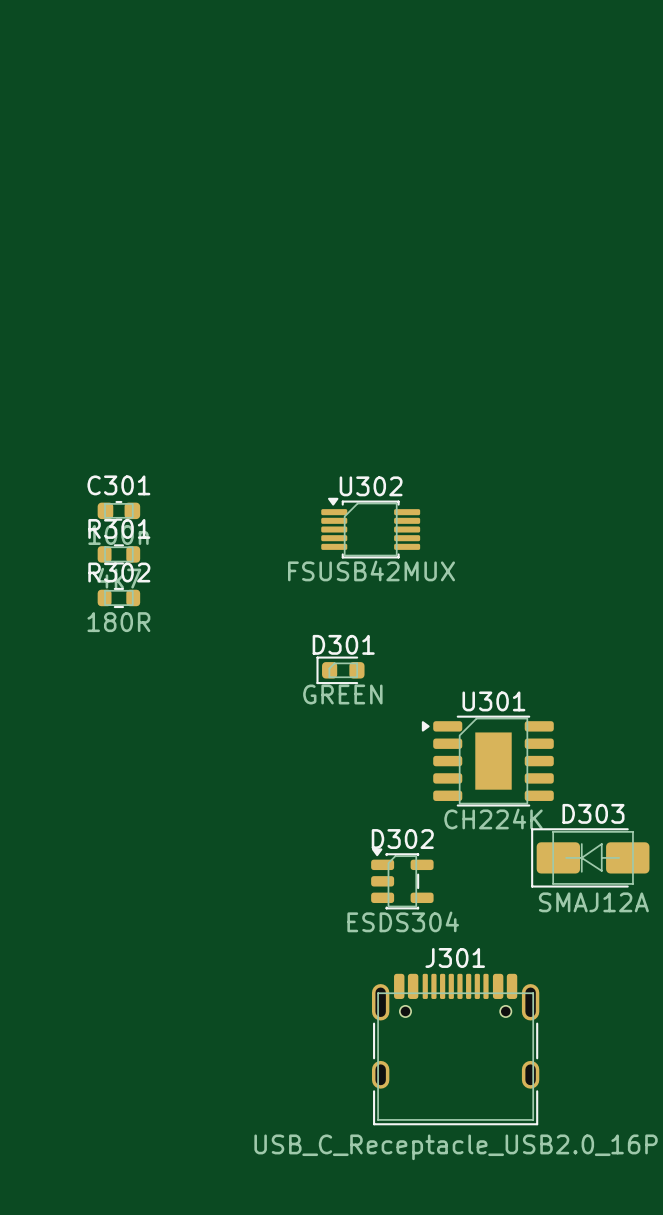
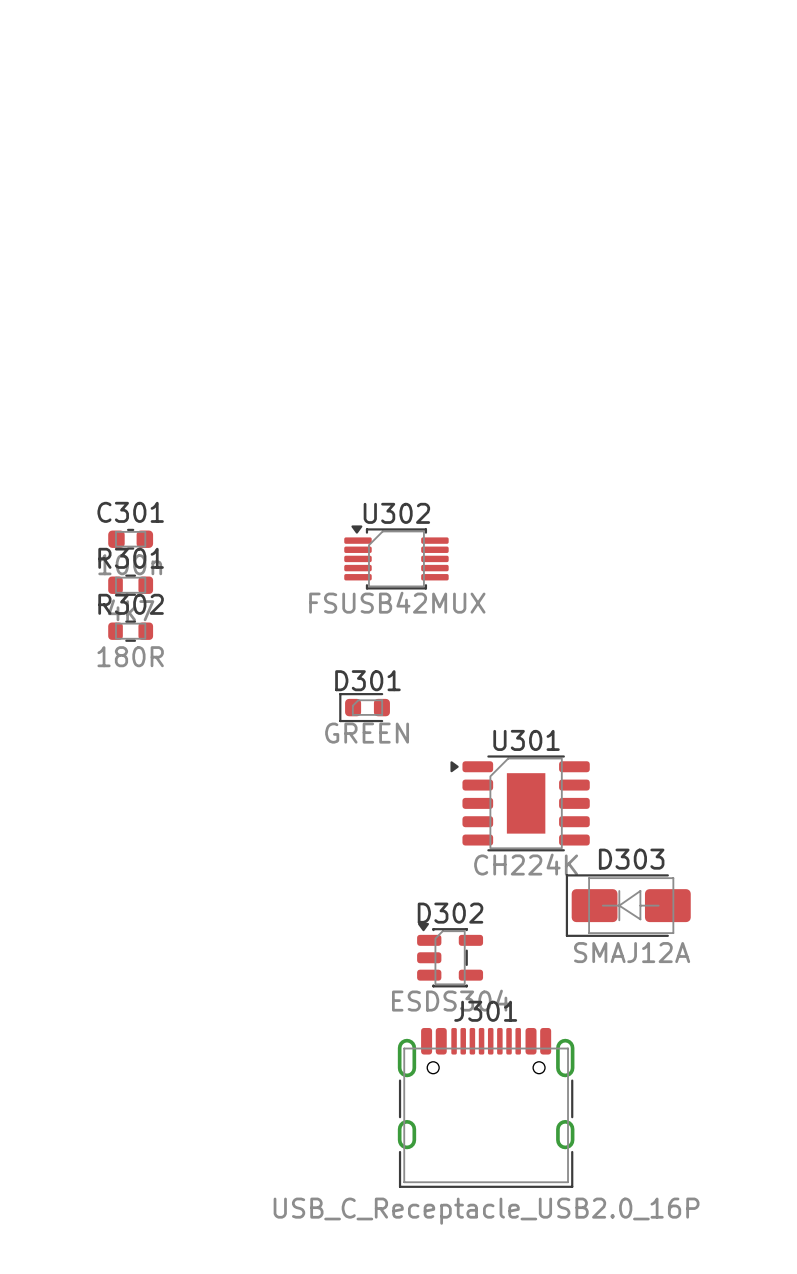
D302 position: (402, 878) -> (450, 955)

